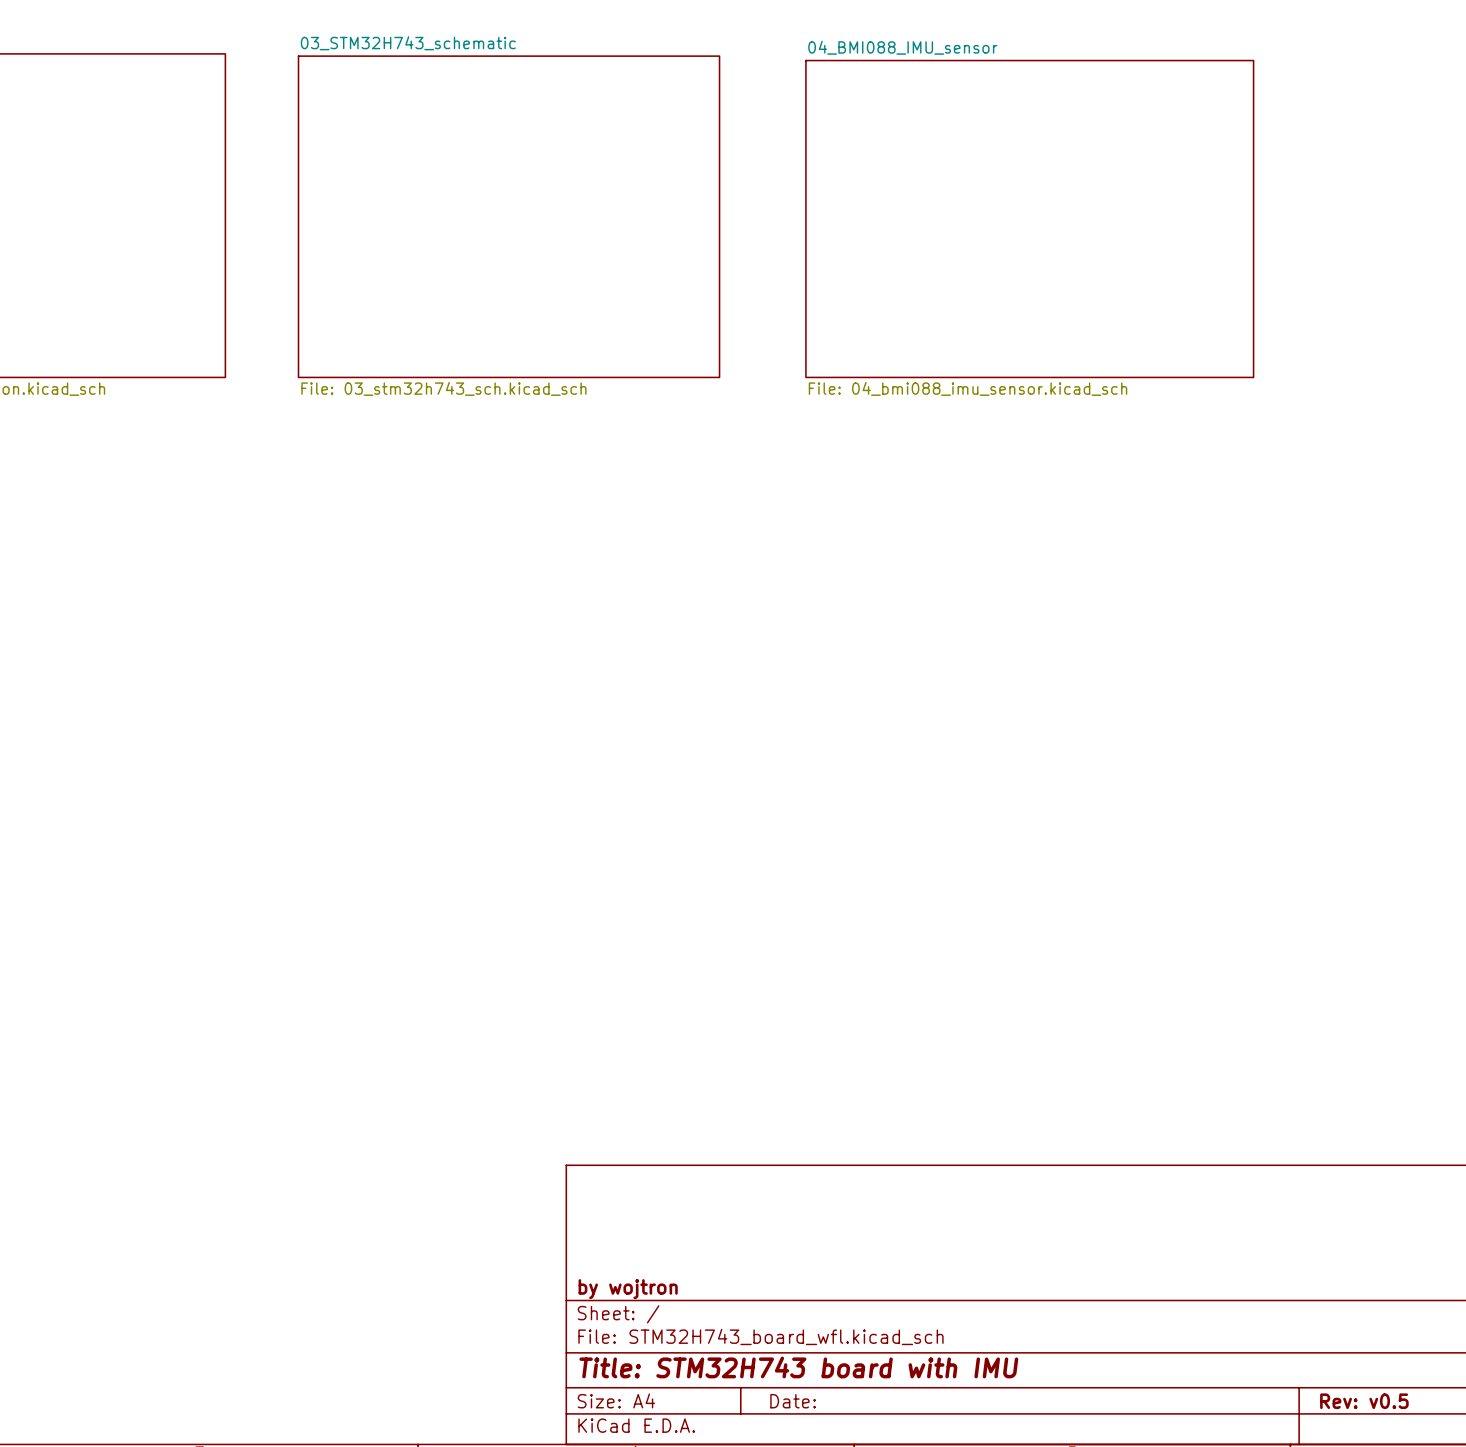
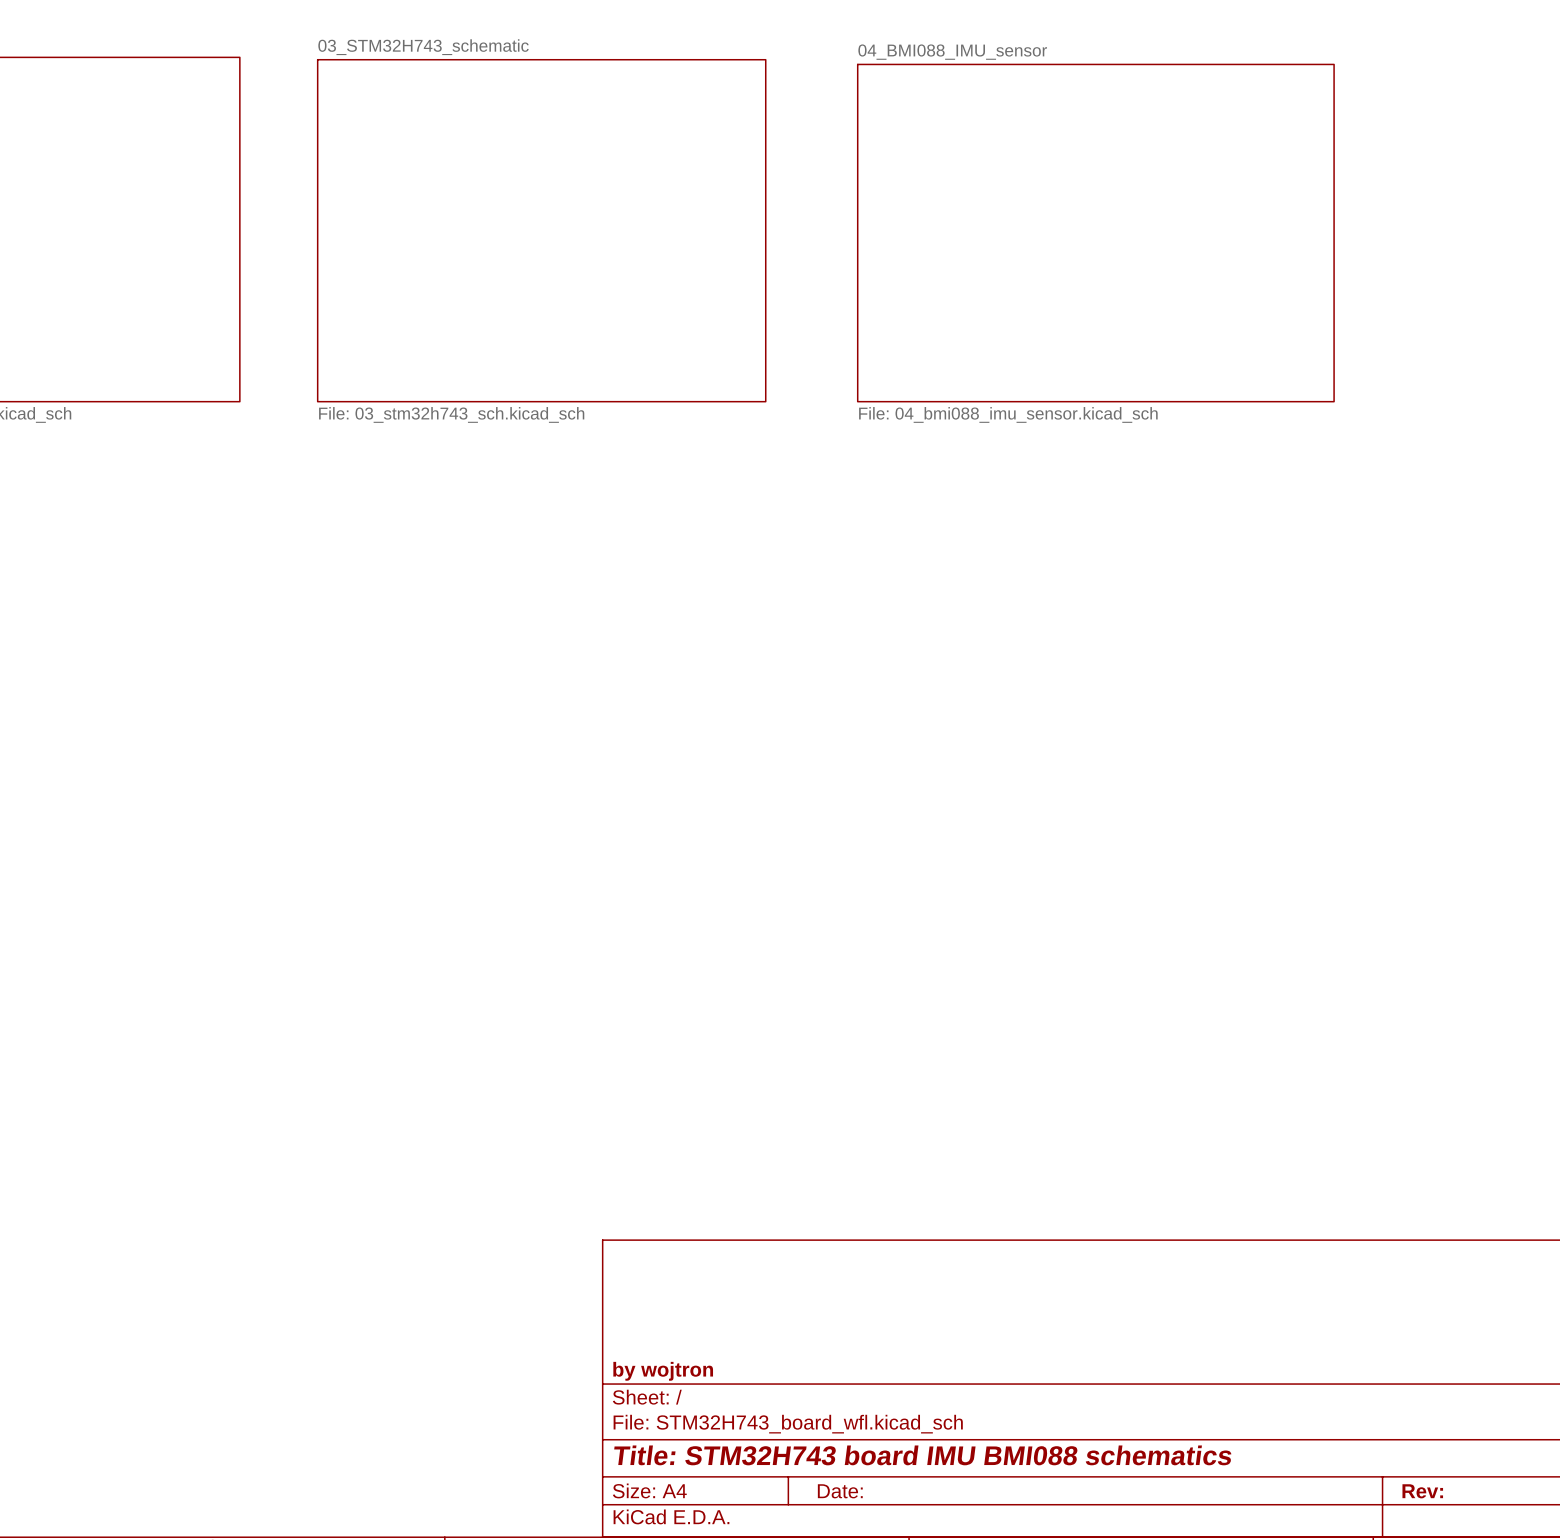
title block: Title: STM32H743 board with IMU (798, 1367) -> Title: STM32H743 board IMU BMI088 schematics (922, 1455)
title block: Rev: v0.5 (1364, 1401) -> Rev: (1422, 1491)

